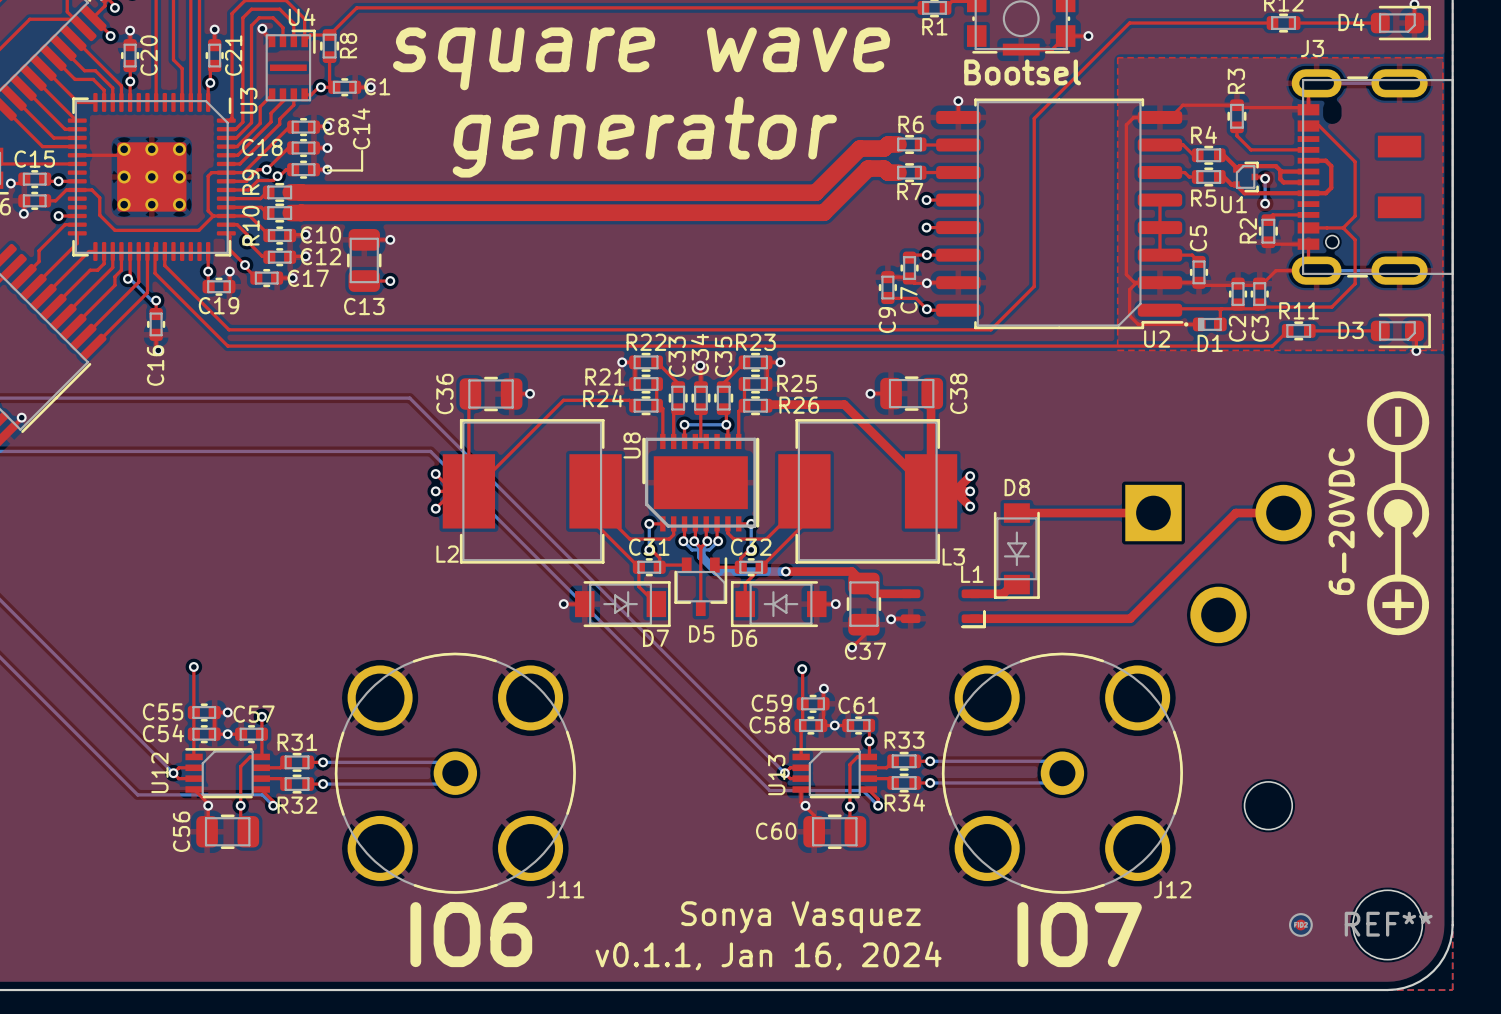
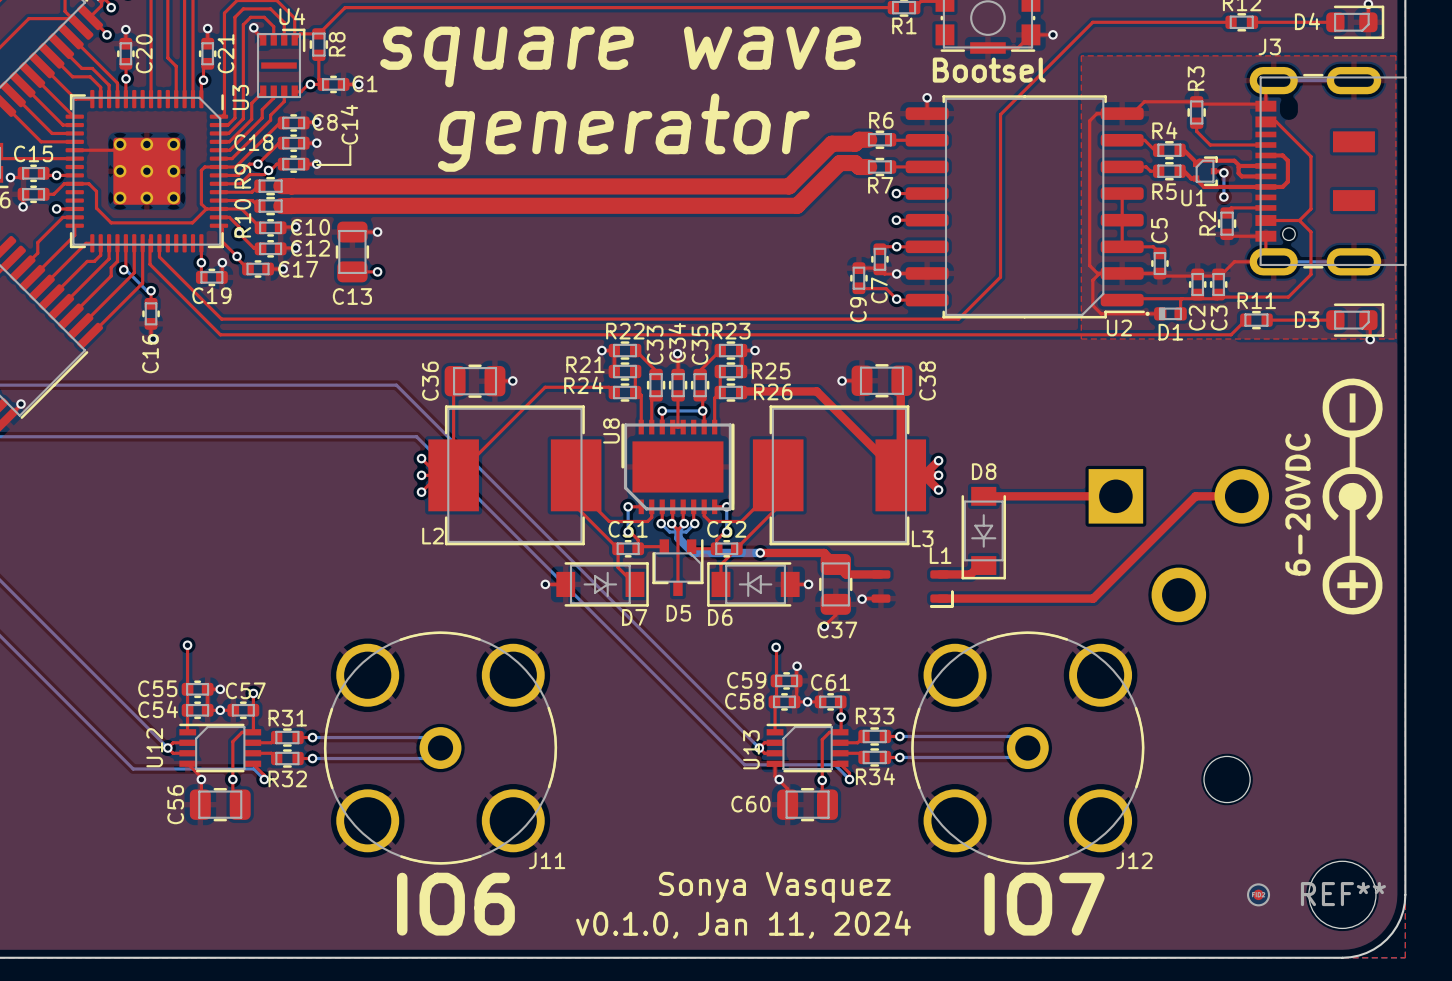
text: v0.1.1, Jan 16, 2024 (768, 955) -> v0.1.0, Jan 11, 2024 (743, 924)

